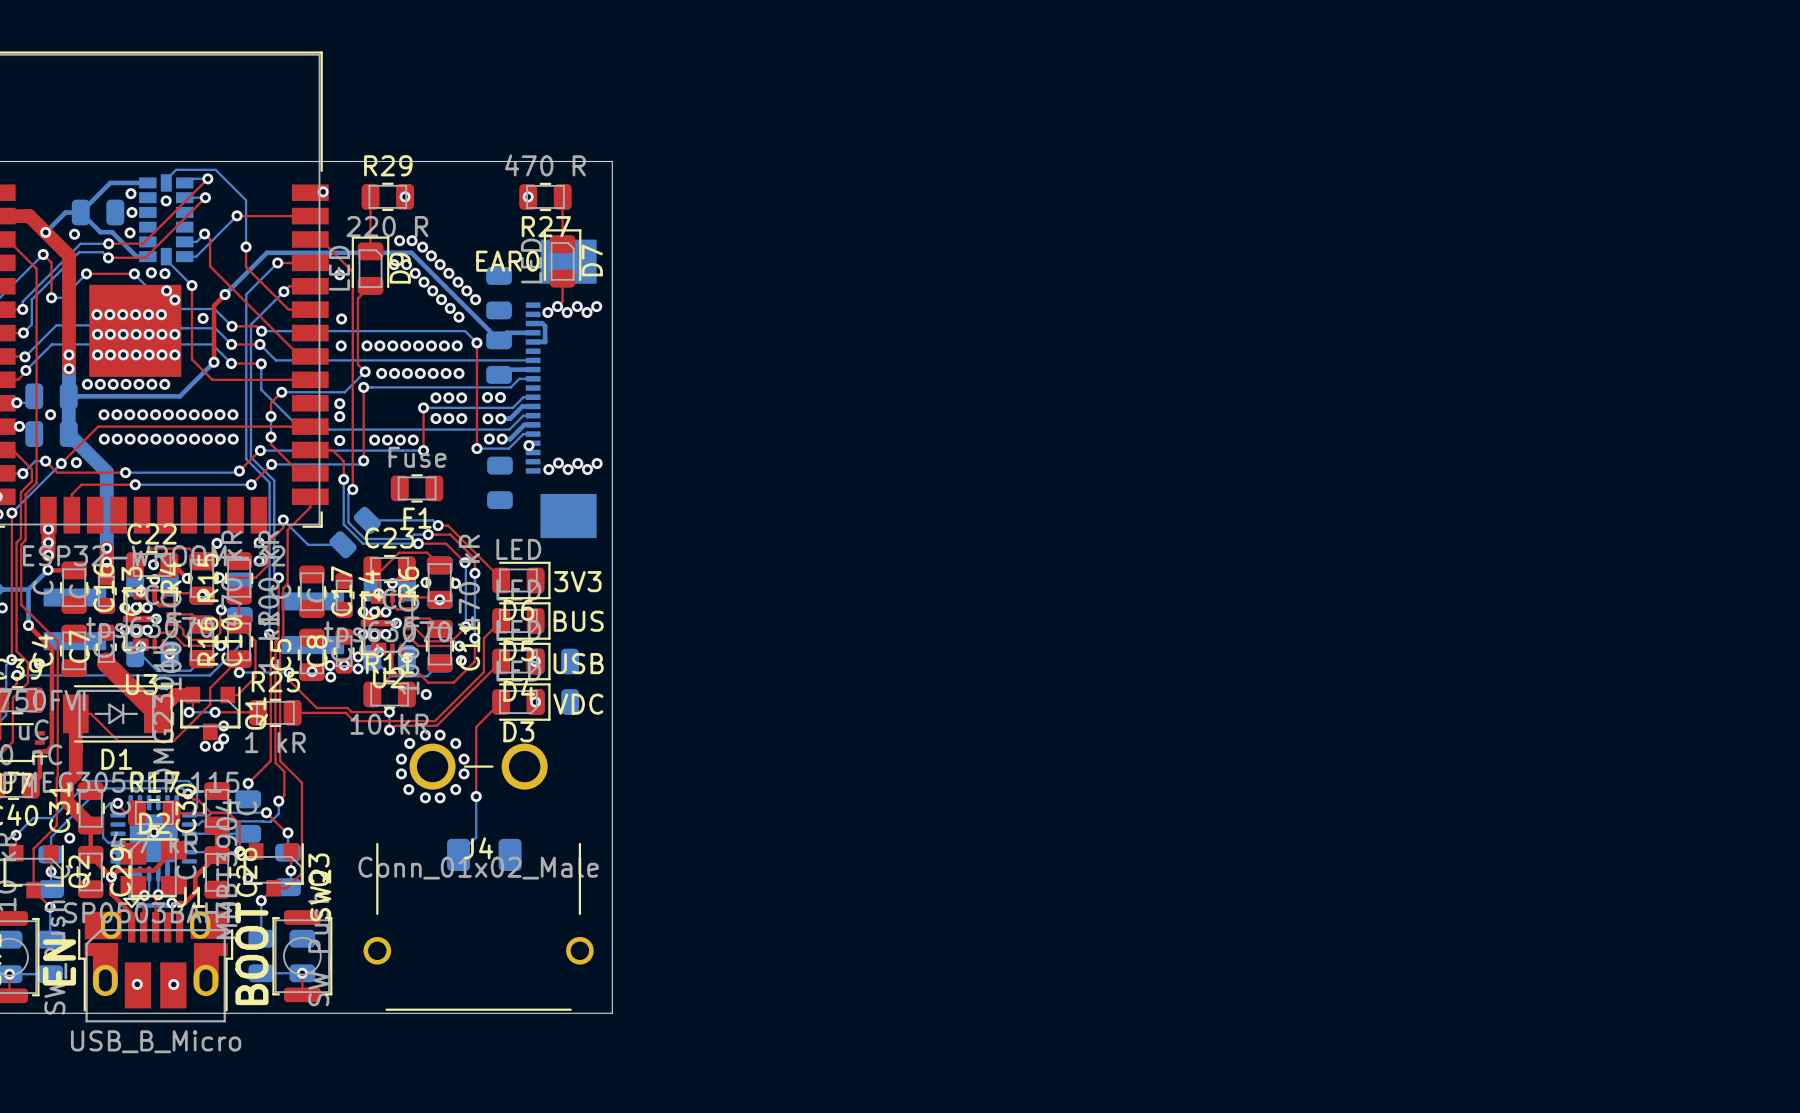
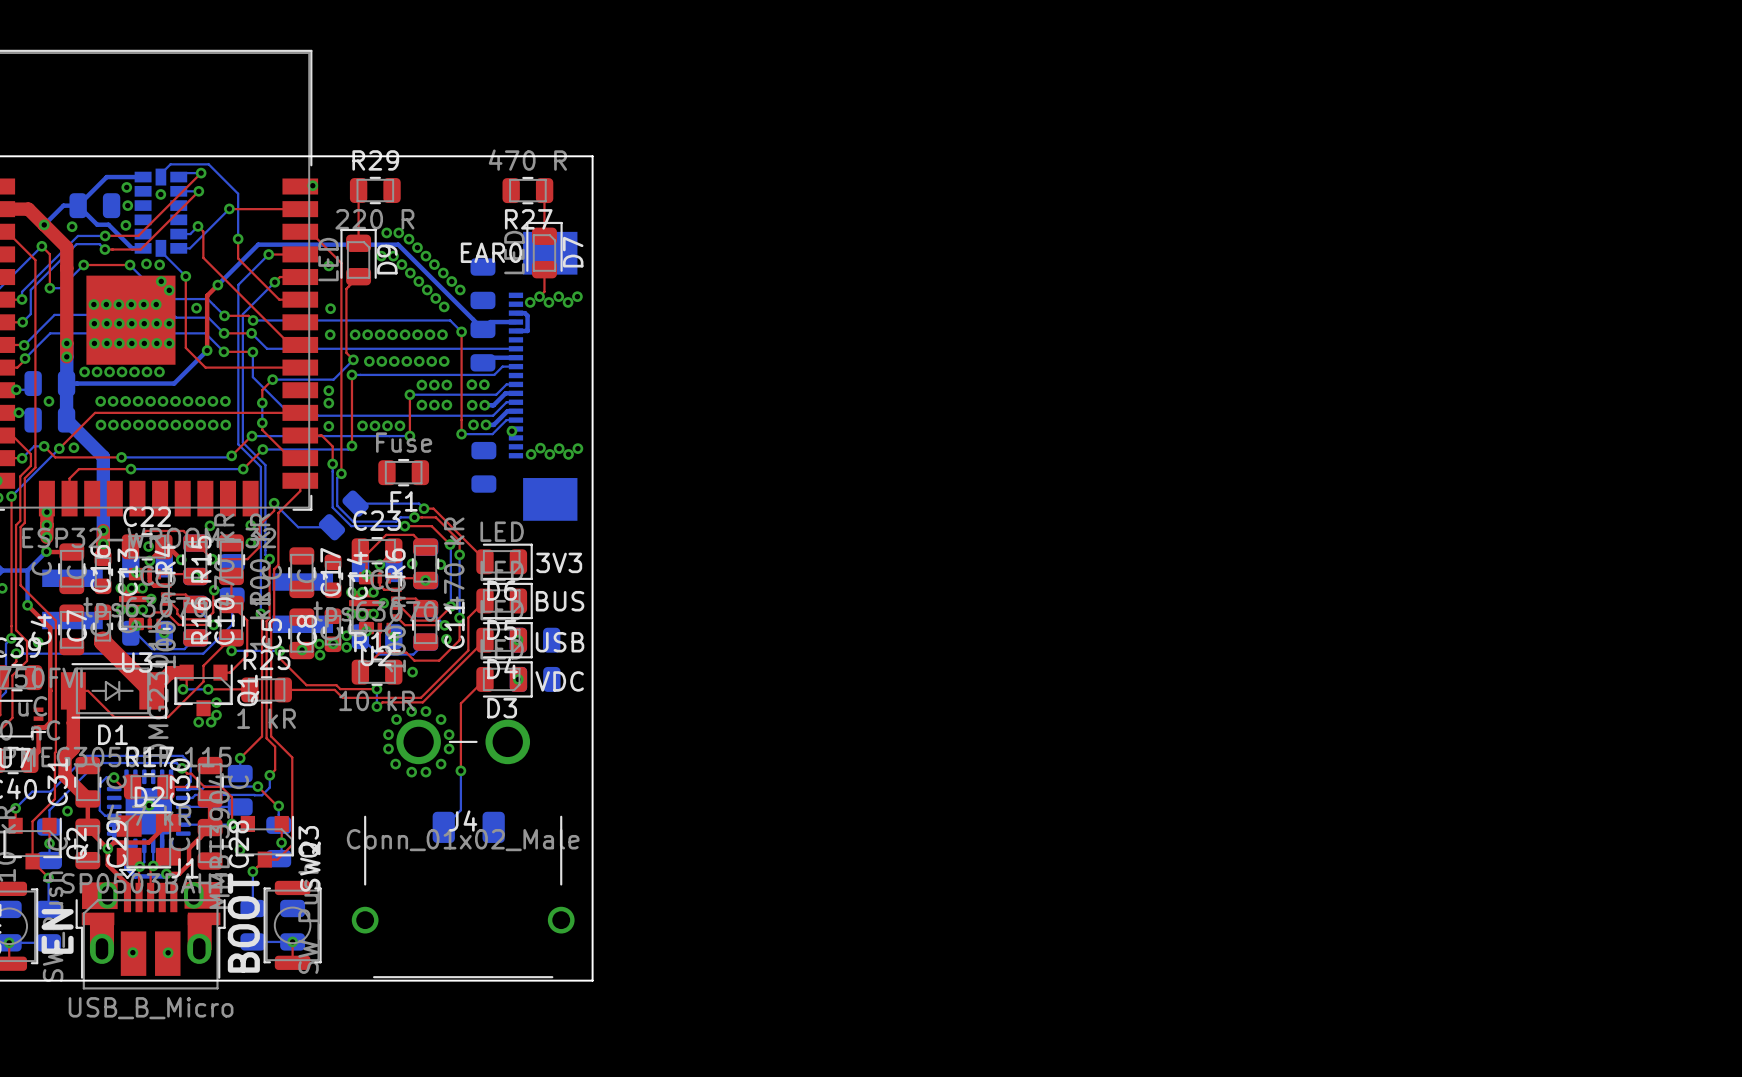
via: (405, 196) -> none
via: (528, 196) -> none

